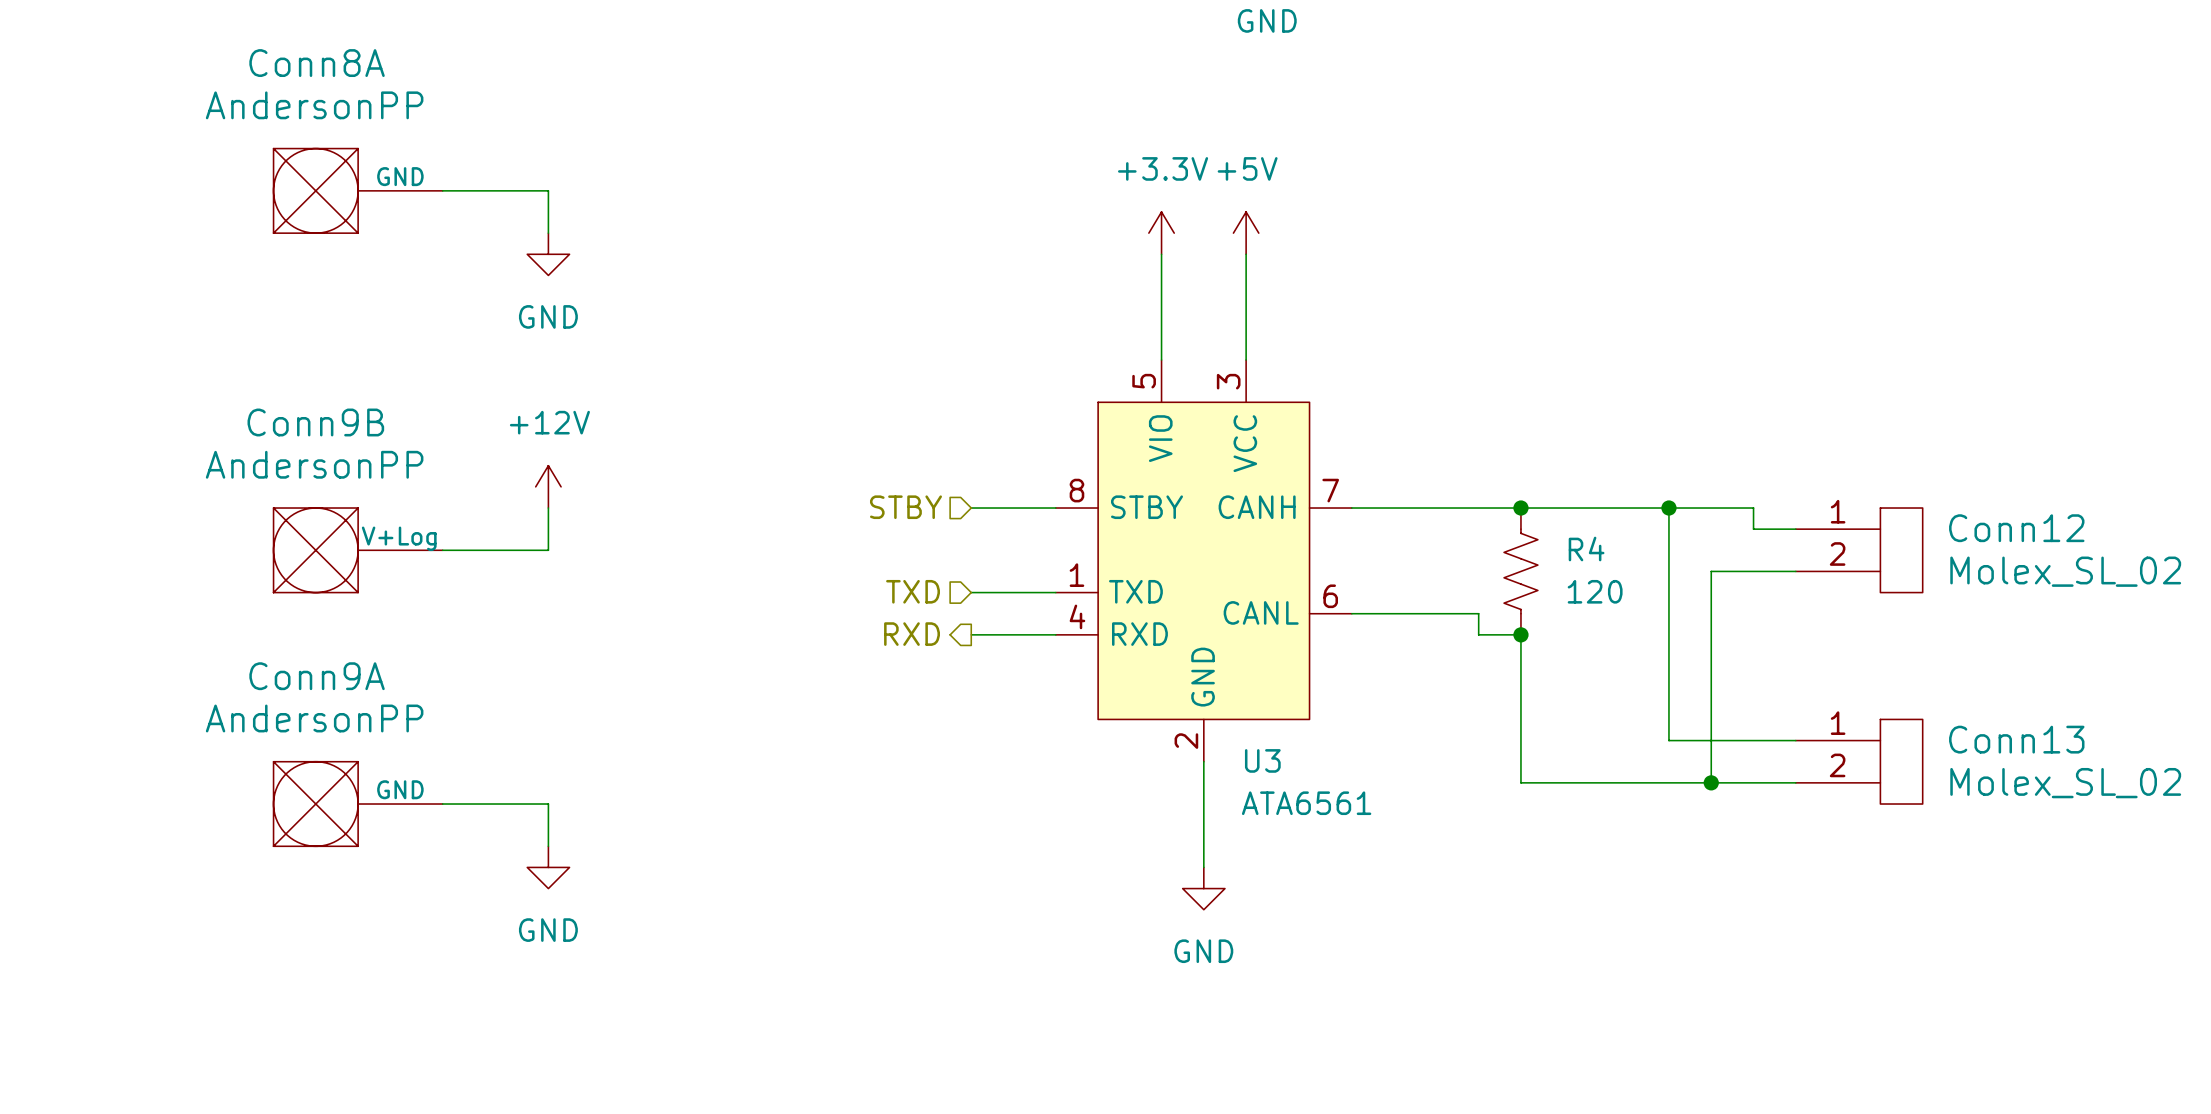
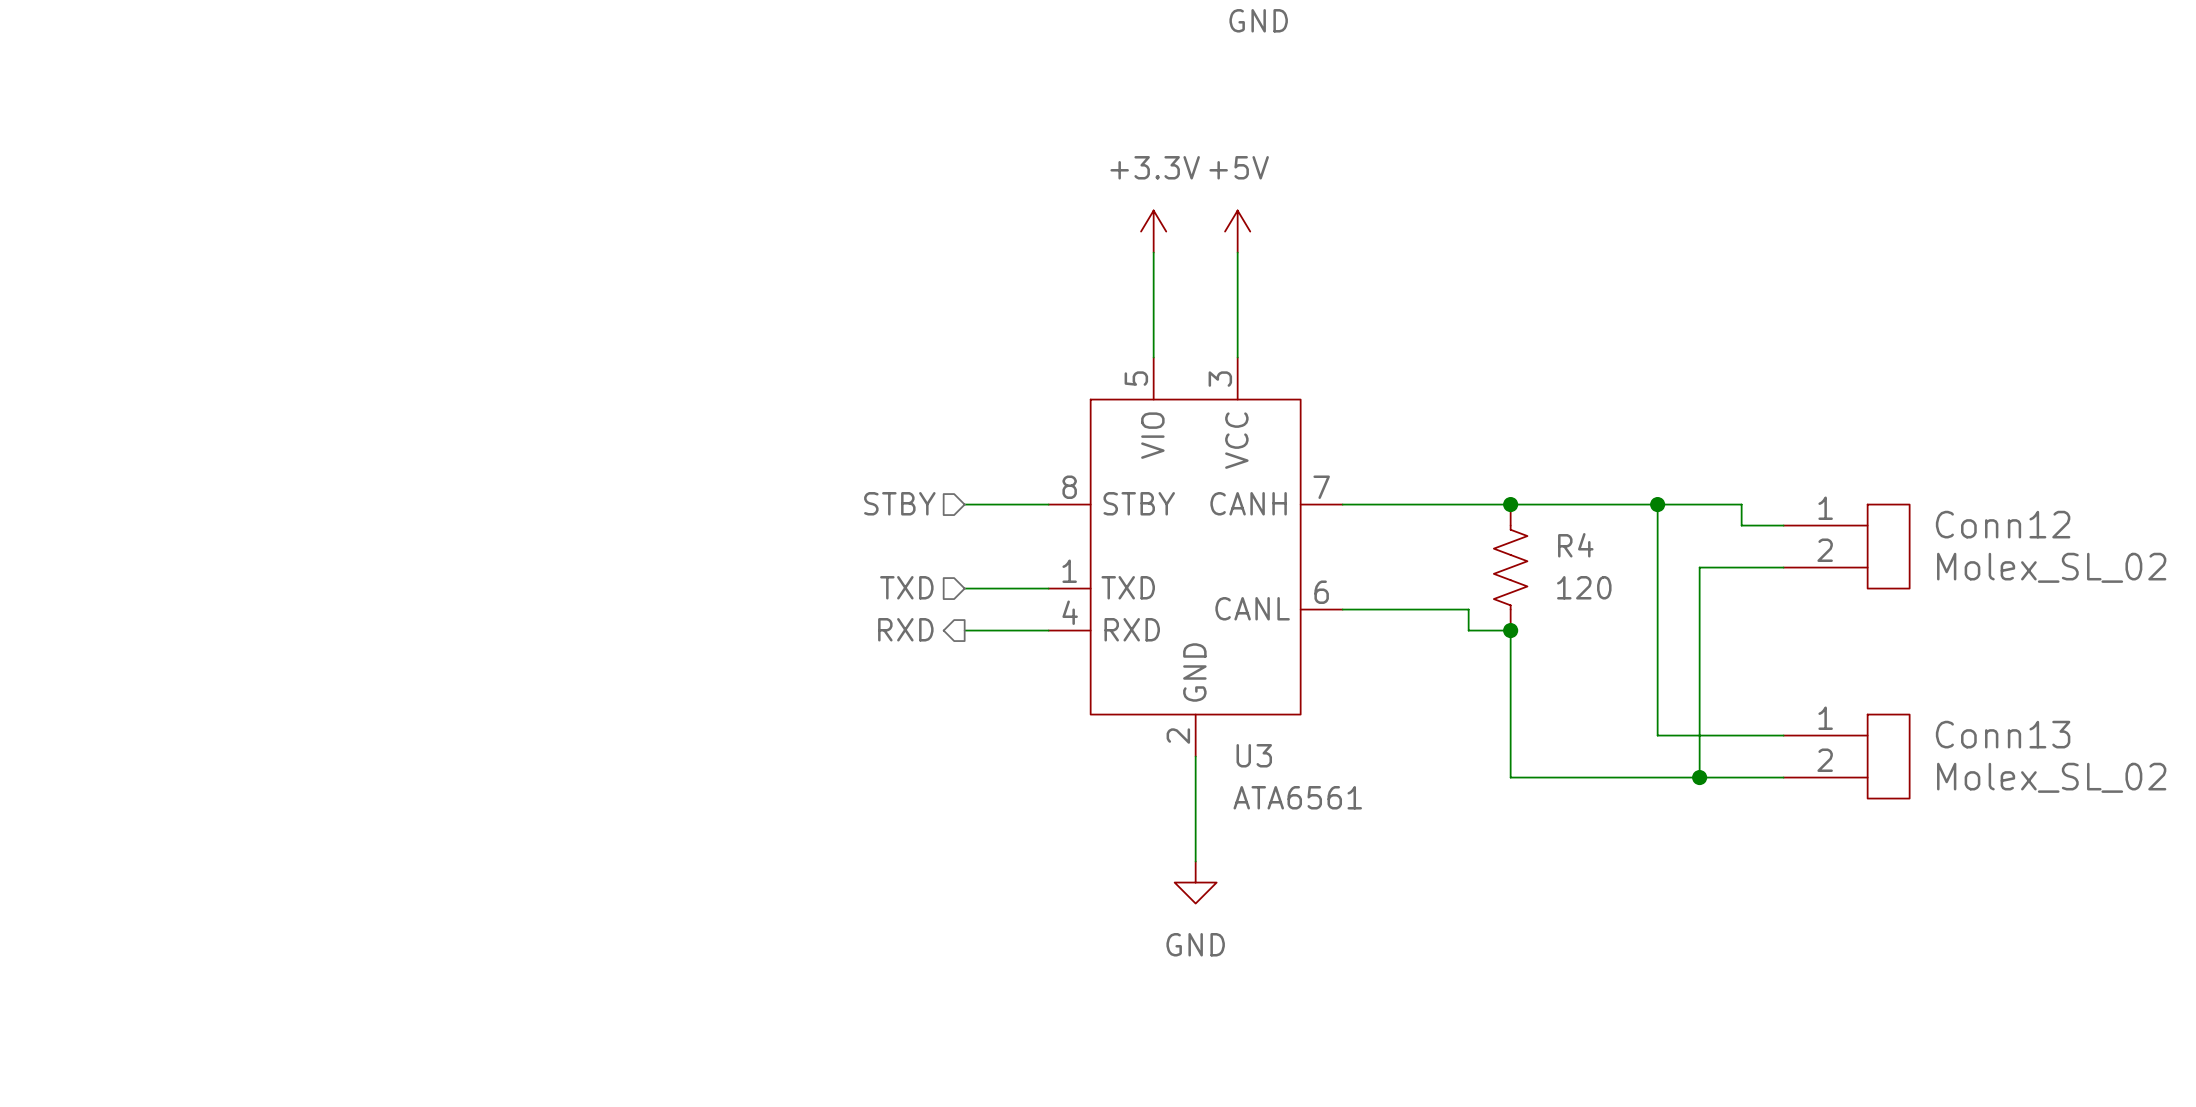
Conn8A: AndersonPP (358, 190) -> none
wire: (442, 190) (548, 190) (548, 233) -> none
power symbol: GND (548, 254) -> none
power symbol: +12V (548, 486) -> none
wire: (548, 508) (548, 550) (442, 550) -> none
Conn9B: AndersonPP (358, 550) -> none
Conn9A: AndersonPP (358, 804) -> none
wire: (442, 804) (548, 804) (548, 846) -> none
power symbol: GND (548, 867) -> none

